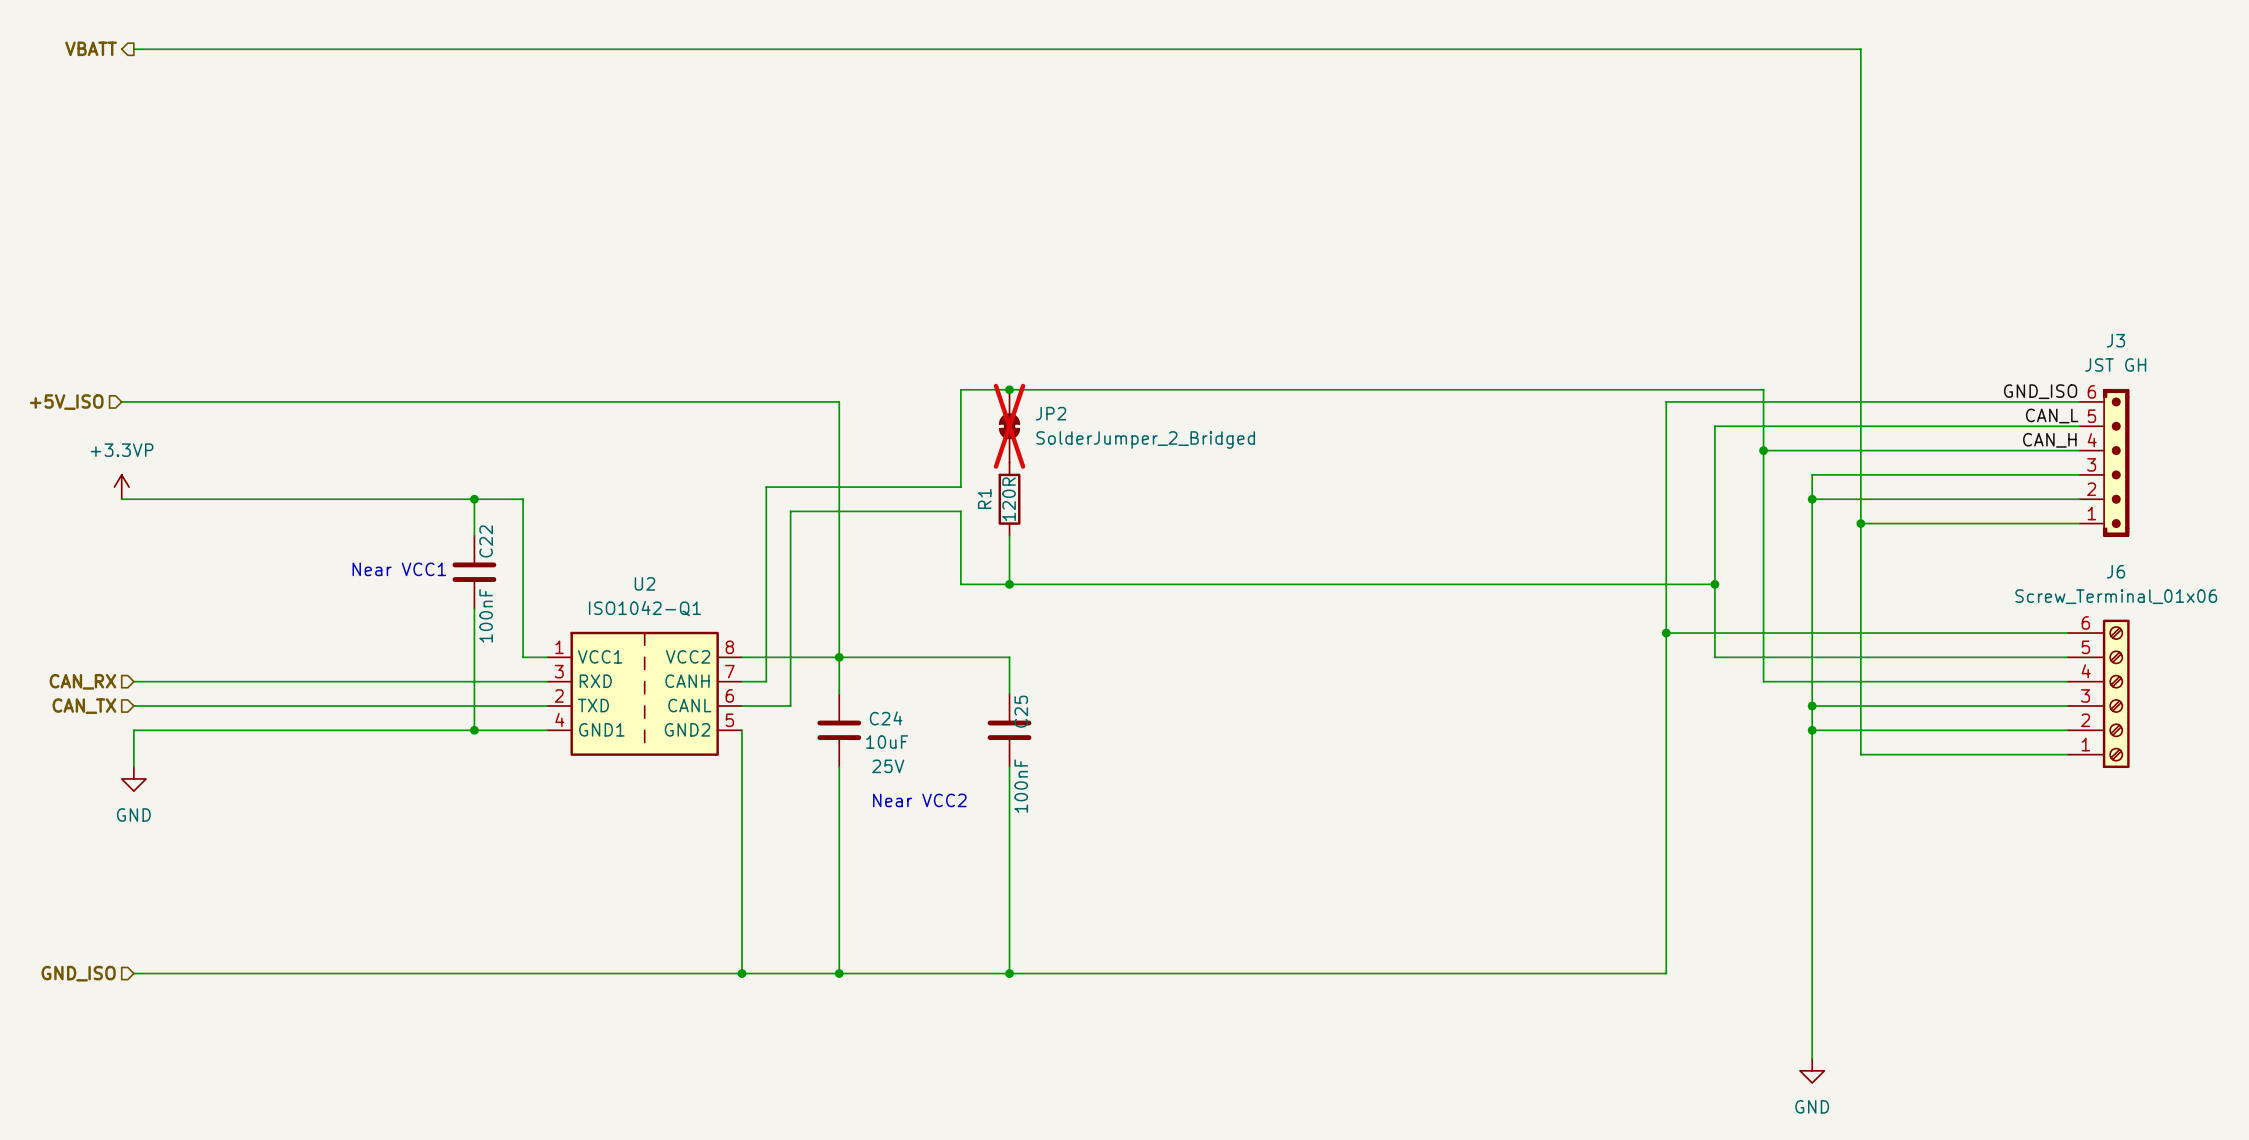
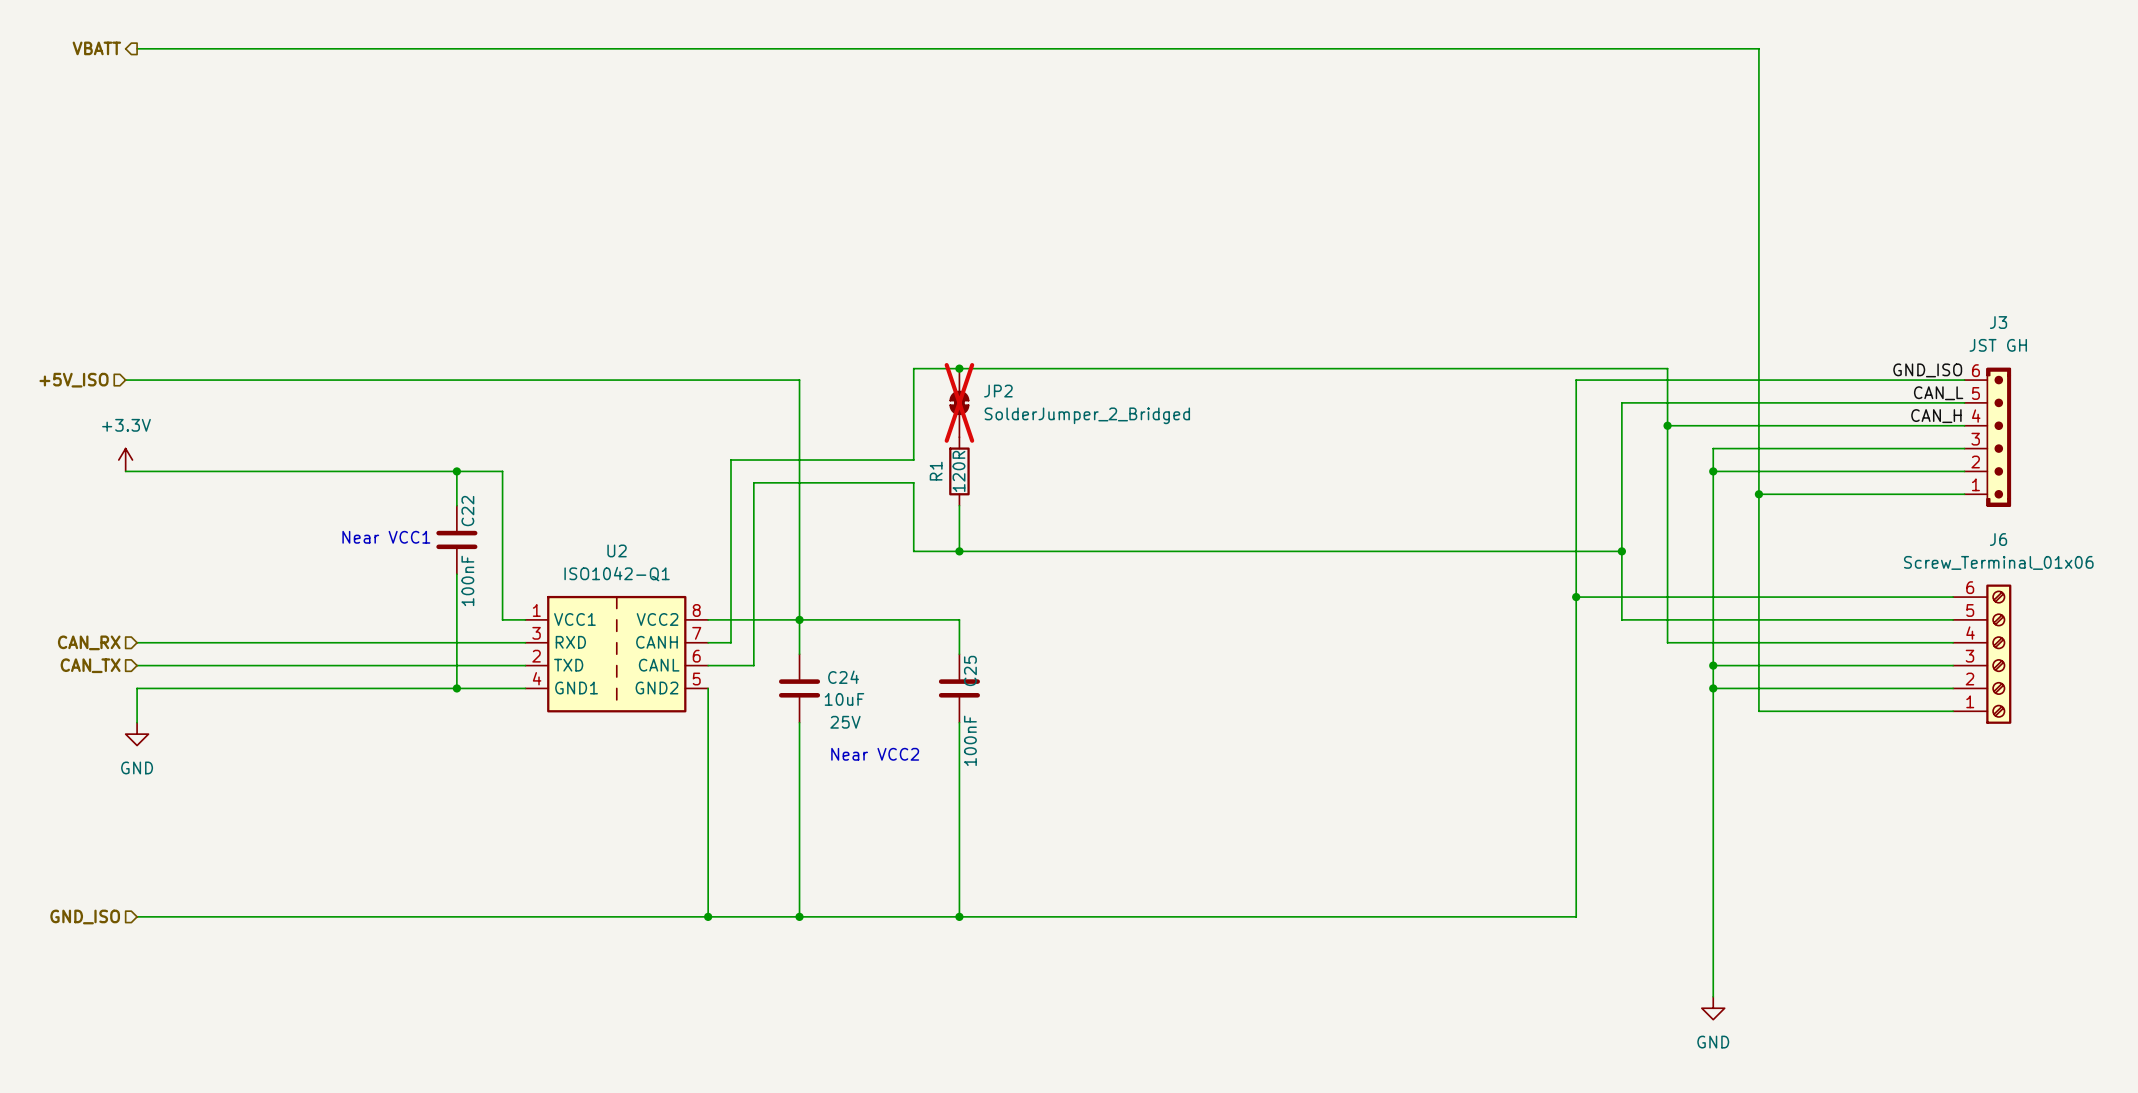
power symbol: +3.3VP (121, 487) -> +3.3V (125, 460)

